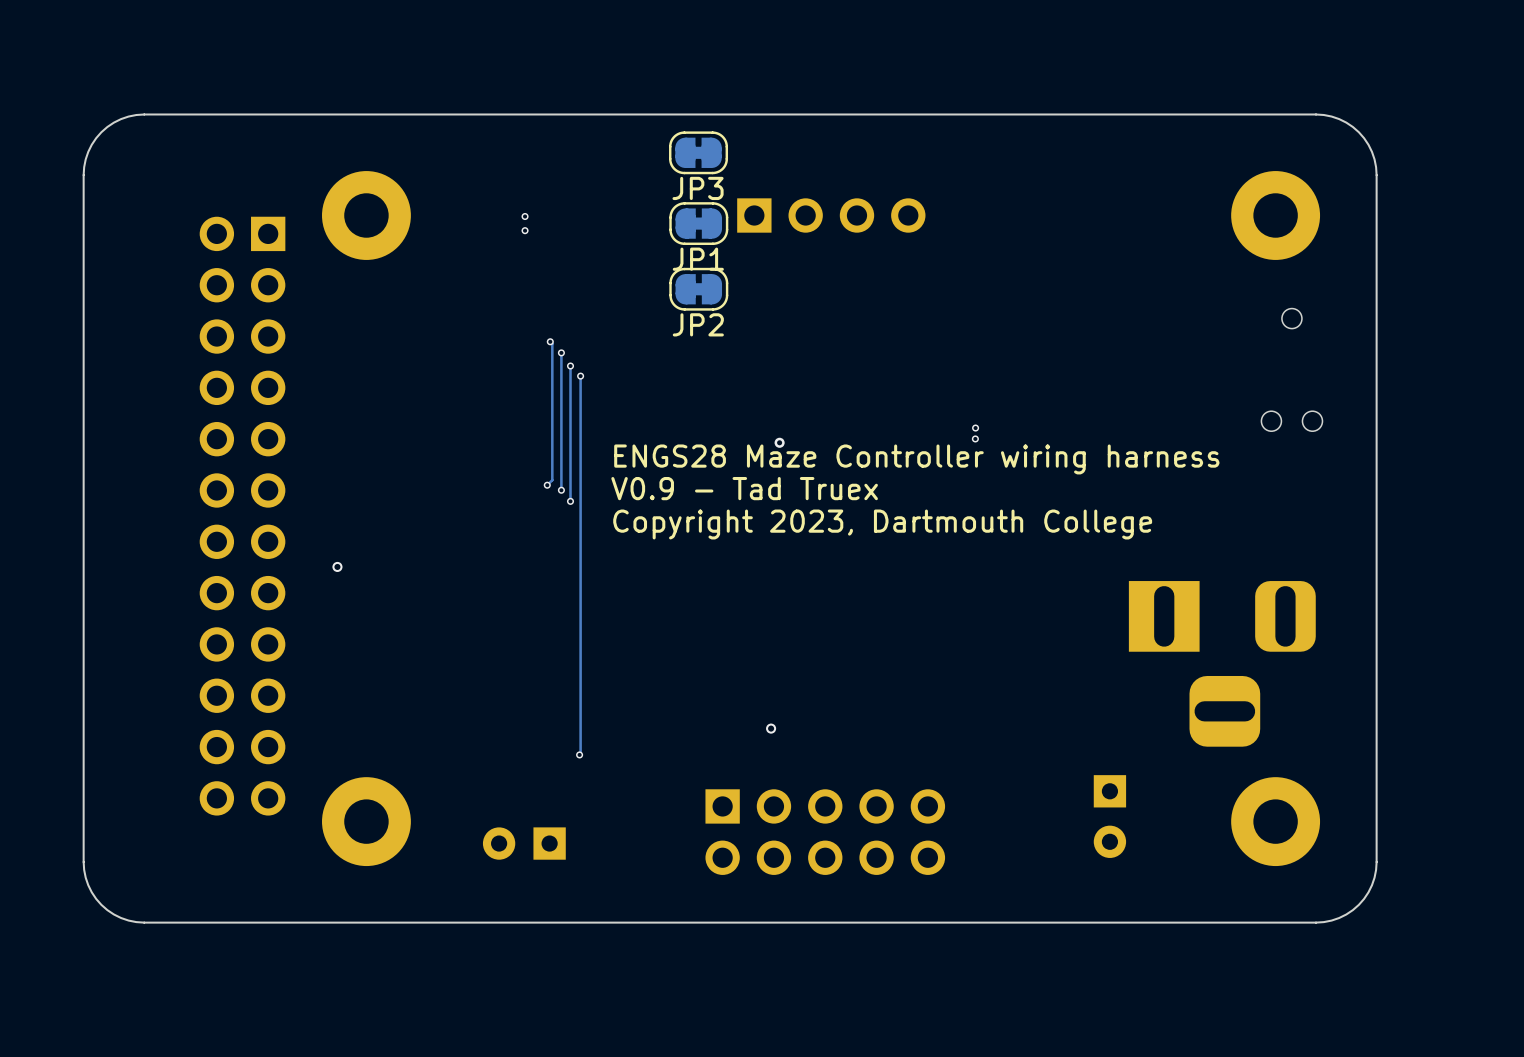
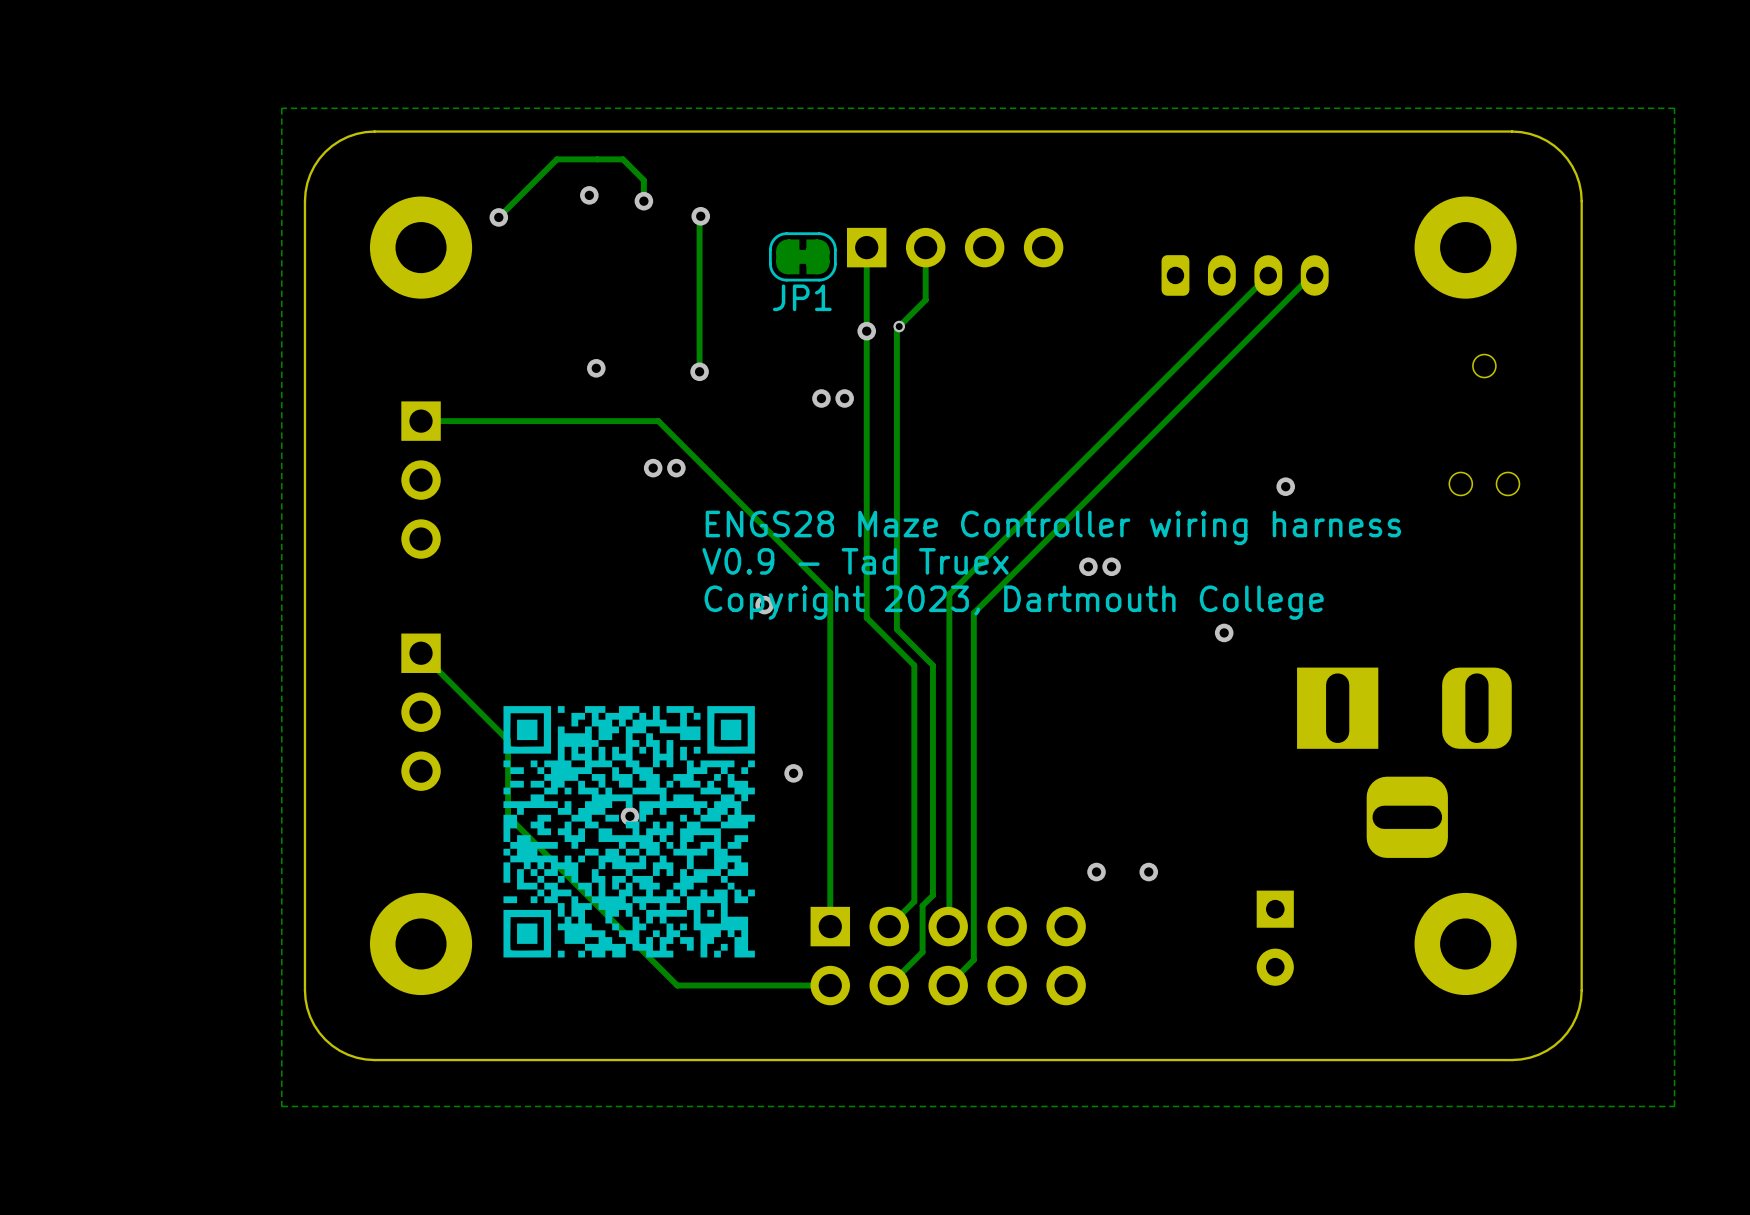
zone outline: none -> (1674, 108) (1674, 1106) (281, 1106) (281, 108) (1674, 108)
board edge: (326, 114) (144, 114) (128, 116) (107, 127) (96, 138) (85, 159) (83, 175) (83, 862) (85, 877) (96, 898) (107, 910) (121, 918) (136, 922) (326, 922) -> (374, 131) (347, 136) (325, 151) (310, 174) (304, 201) (305, 999) (310, 1017) (325, 1039) (347, 1054) (374, 1060)
JP3: (698, 152) -> none
via: none -> (589, 195)
track: none -> (643, 201) (643, 180) (622, 159) (556, 159) (498, 217)
via: none -> (643, 201)
track: none -> (700, 216) (699, 371)
via: none -> (700, 216)
via: none -> (498, 217)
track: none -> (866, 247) (866, 617) (914, 665) (914, 901) (889, 926)
track: none -> (925, 247) (925, 300) (896, 328) (896, 629) (932, 665) (932, 895) (922, 905) (922, 952) (889, 985)
via: (525, 216) -> none
via: (525, 230) -> none
part: none -> (1245, 275)
track: none -> (1268, 275) (949, 594) (948, 926)
track: none -> (1314, 275) (1311, 275) (973, 613) (973, 959) (948, 985)
via: none -> (899, 326)
via: none -> (866, 331)
JP2: (698, 289) -> none
via: none -> (596, 368)
via: none -> (699, 371)
track: (550, 341) (552, 343) (552, 480) (547, 485) -> none
via: (550, 341) -> none
via: none -> (821, 398)
via: none -> (844, 398)
track: (561, 352) (561, 490) -> none
via: (561, 352) -> none
track: none -> (421, 421) (658, 421) (830, 593) (830, 926)
track: (570, 366) (570, 501) -> none
via: (570, 366) -> none
track: (580, 376) (579, 754) -> none
via: (580, 376) -> none
via: none -> (653, 468)
via: none -> (676, 468)
part: none -> (421, 480)
via: none -> (1285, 486)
via: (975, 428) -> none
via: (975, 438) -> none
via: (779, 442) -> none
via: (547, 485) -> none
via: (561, 490) -> none
via: none -> (1088, 566)
via: none -> (1111, 566)
via: (570, 501) -> none
part: (242, 516) -> none
via: none -> (764, 605)
via: none -> (1224, 632)
via: (337, 566) -> none
track: none -> (421, 653) (508, 740) (508, 816) (677, 985) (830, 985)
drawing: none -> [503, 706, 755, 958]
part: none -> (421, 712)
via: none -> (793, 773)
via: none -> (629, 816)
via: (771, 728) -> none
via: (579, 754) -> none
via: none -> (1096, 872)
via: none -> (1148, 872)
part: (524, 843) -> none

